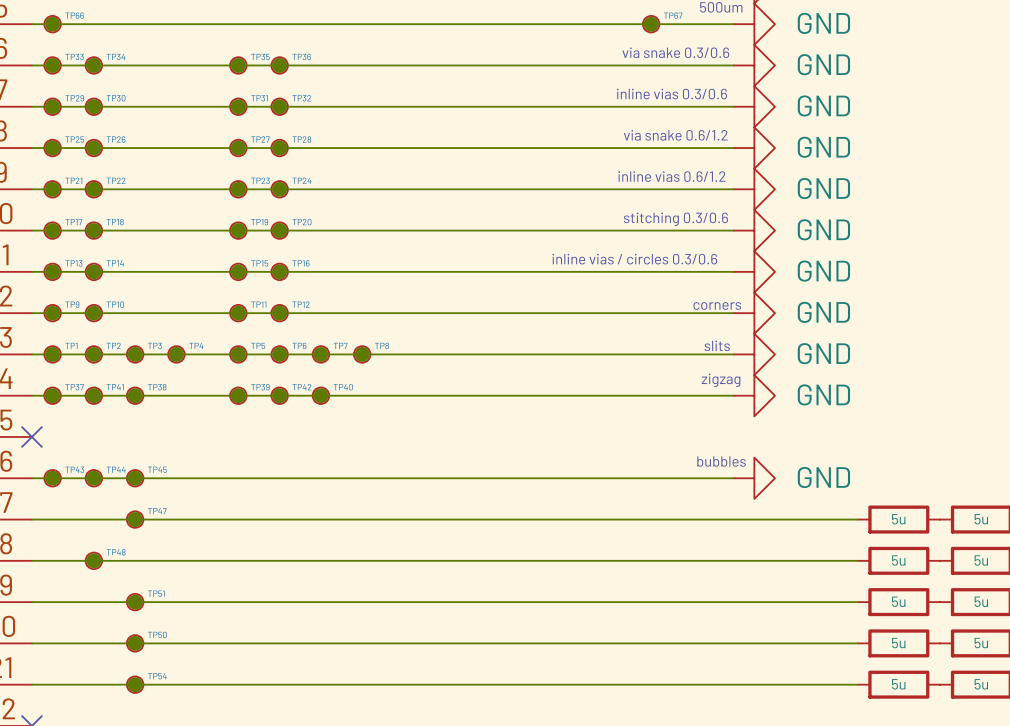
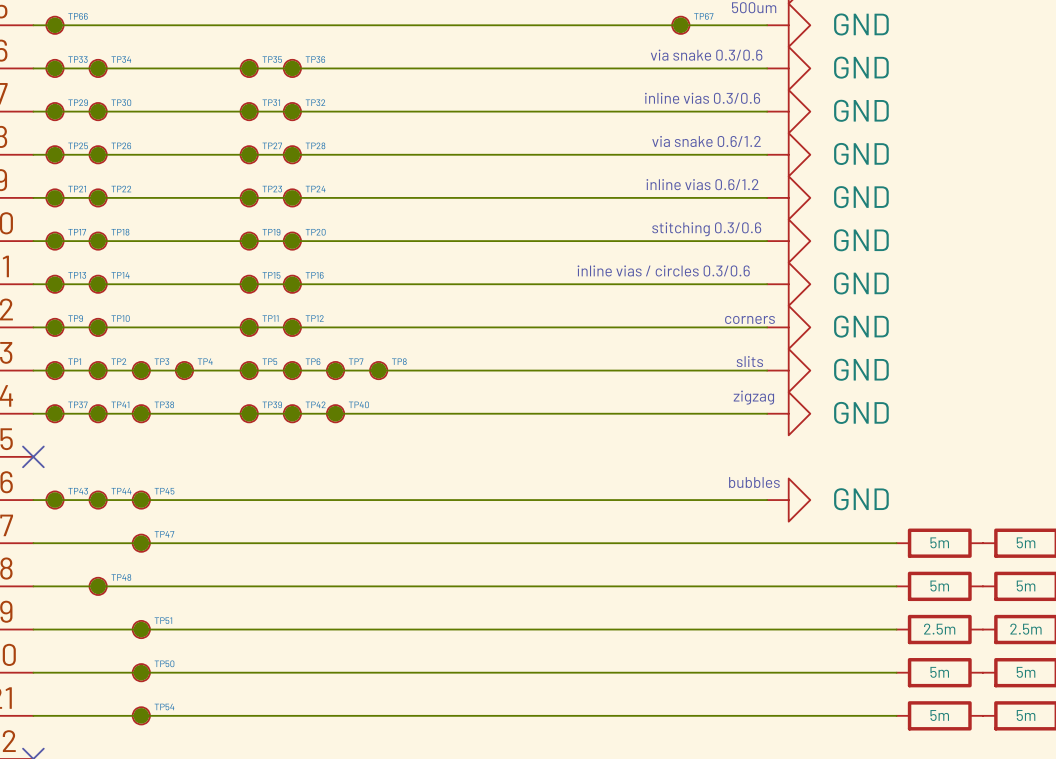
part value: 5u (898, 519) -> 5m (939, 542)
part value: 5u (981, 519) -> 5m (1026, 542)
part value: 5u (898, 560) -> 5m (939, 586)
part value: 5u (981, 560) -> 5m (1026, 586)
part value: 5u (898, 601) -> 2.5m (939, 629)
part value: 5u (981, 601) -> 2.5m (1025, 629)
part value: 5u (898, 643) -> 5m (939, 672)
part value: 5u (981, 643) -> 5m (1026, 672)
part value: 5u (898, 684) -> 5m (939, 715)
part value: 5u (981, 684) -> 5m (1026, 715)

